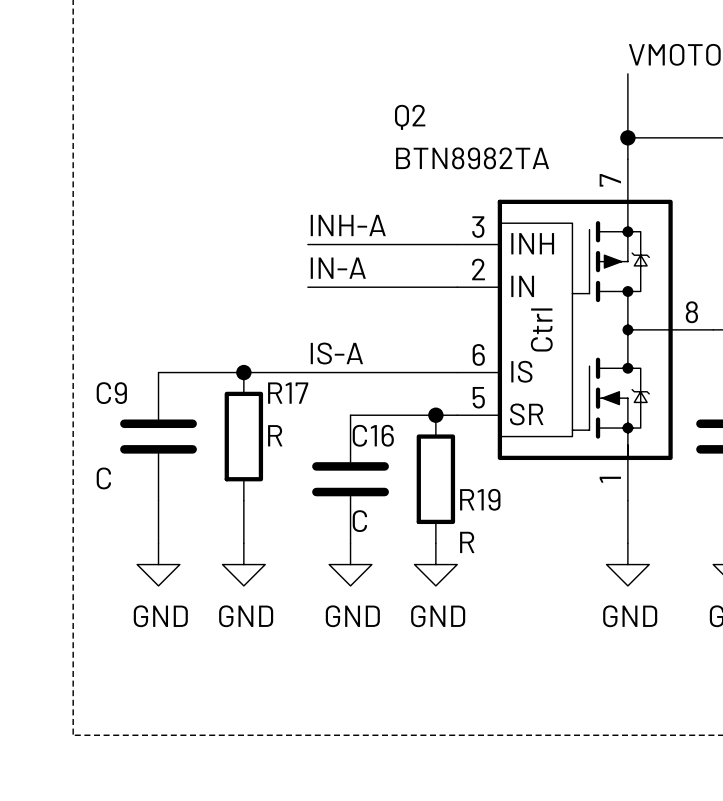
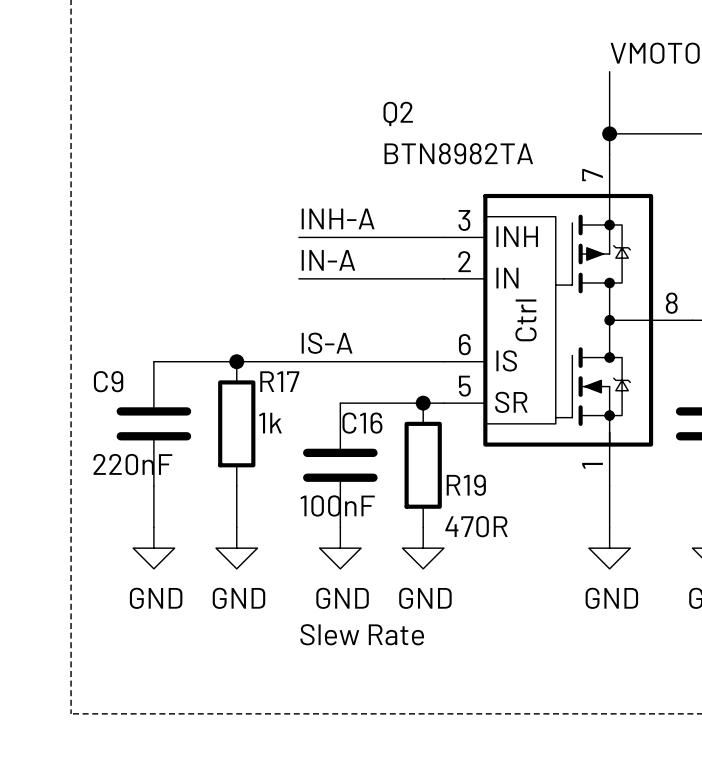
R17 value: R (275, 435) -> 1k (270, 423)
C9 value: C (103, 478) -> 220nF (132, 464)
C16 value: C (359, 521) -> 100nF (337, 505)
R19 value: R (467, 542) -> 470R (476, 526)
text: none -> Slew Rate (362, 634)

